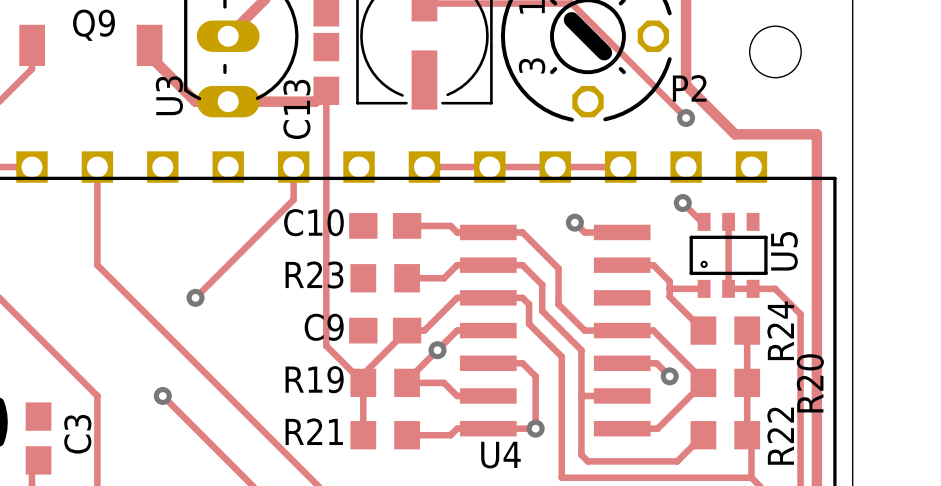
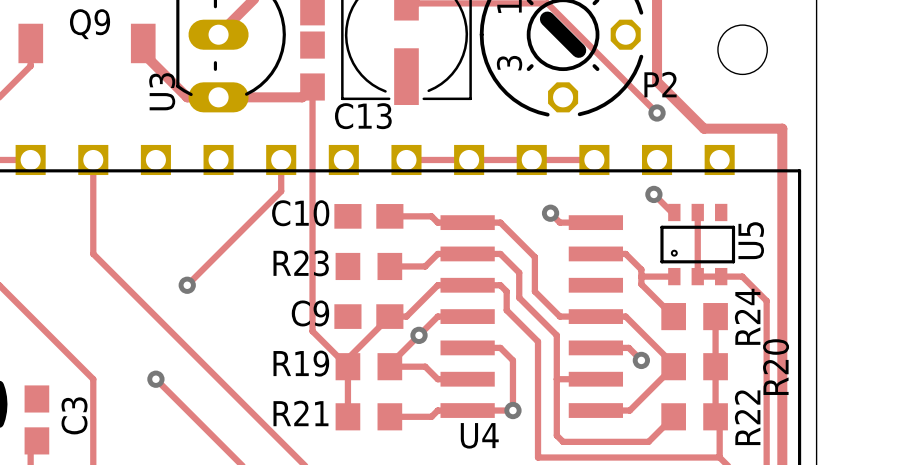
C13 name rotation: 0° (296, 109) -> 90° clockwise (363, 116)
C13 name position: C13 (296, 109) -> C13 (363, 116)

